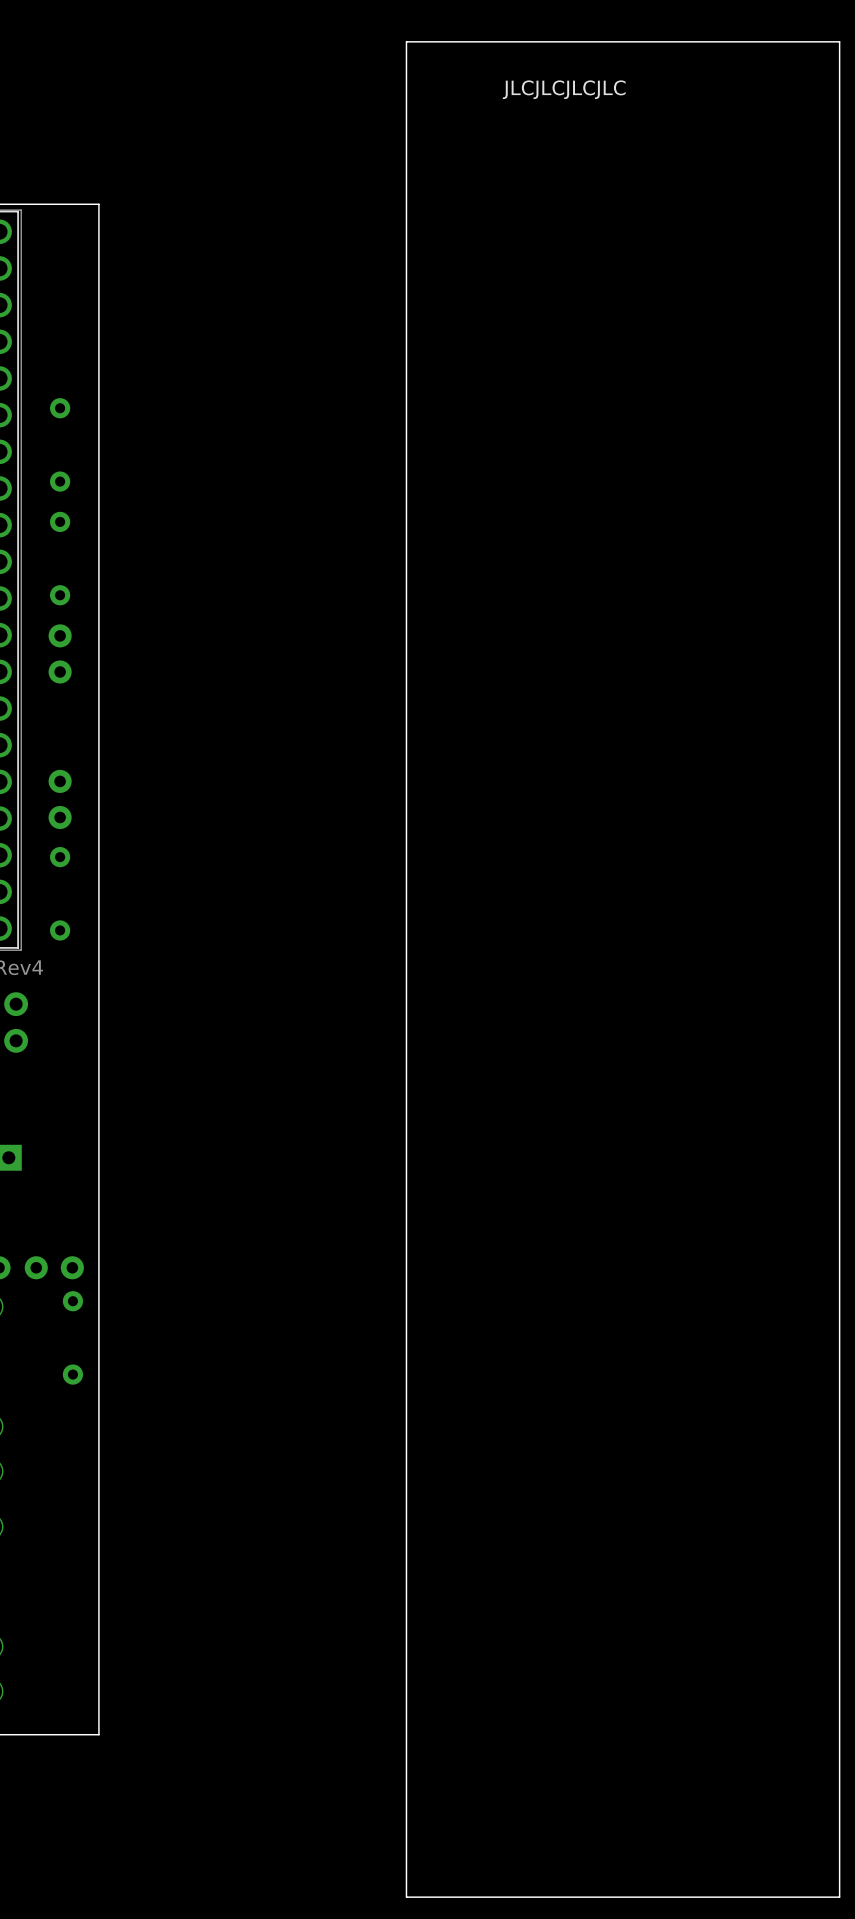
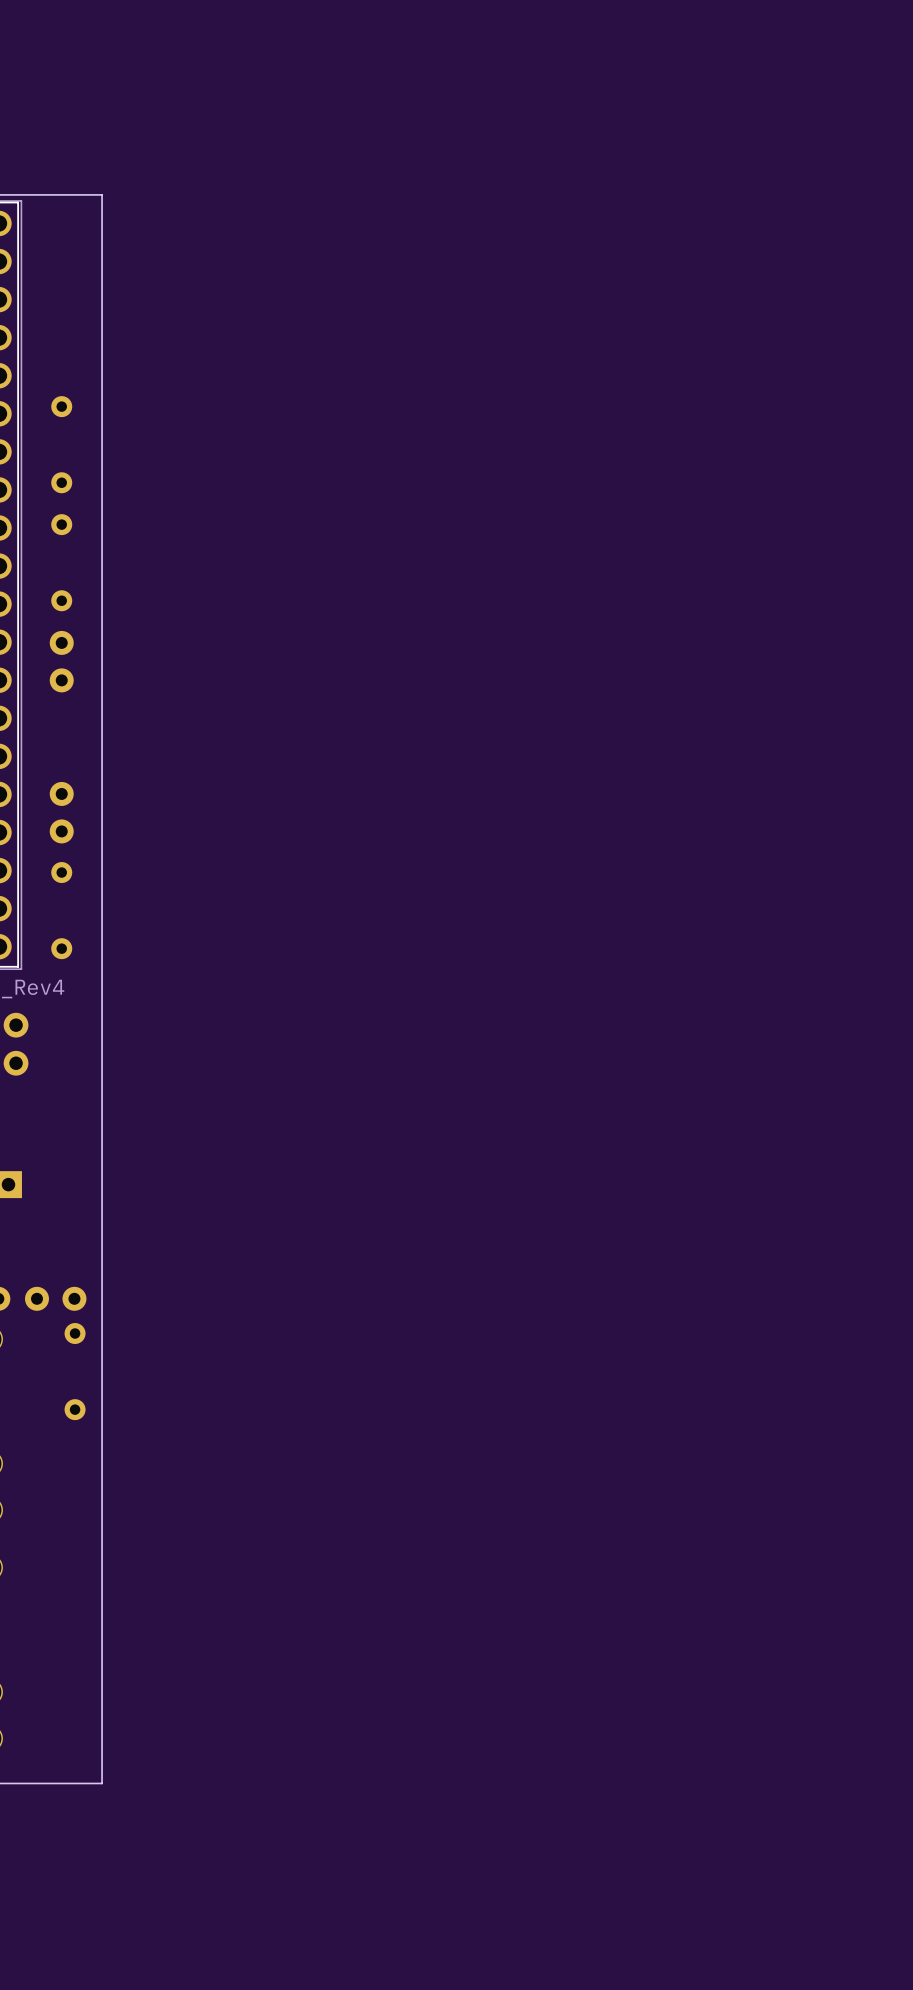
board edge: (839, 41) (406, 41) (406, 1897) (839, 1897) (839, 41) -> none
text: JLCJLCJLCJLC (564, 89) -> none

